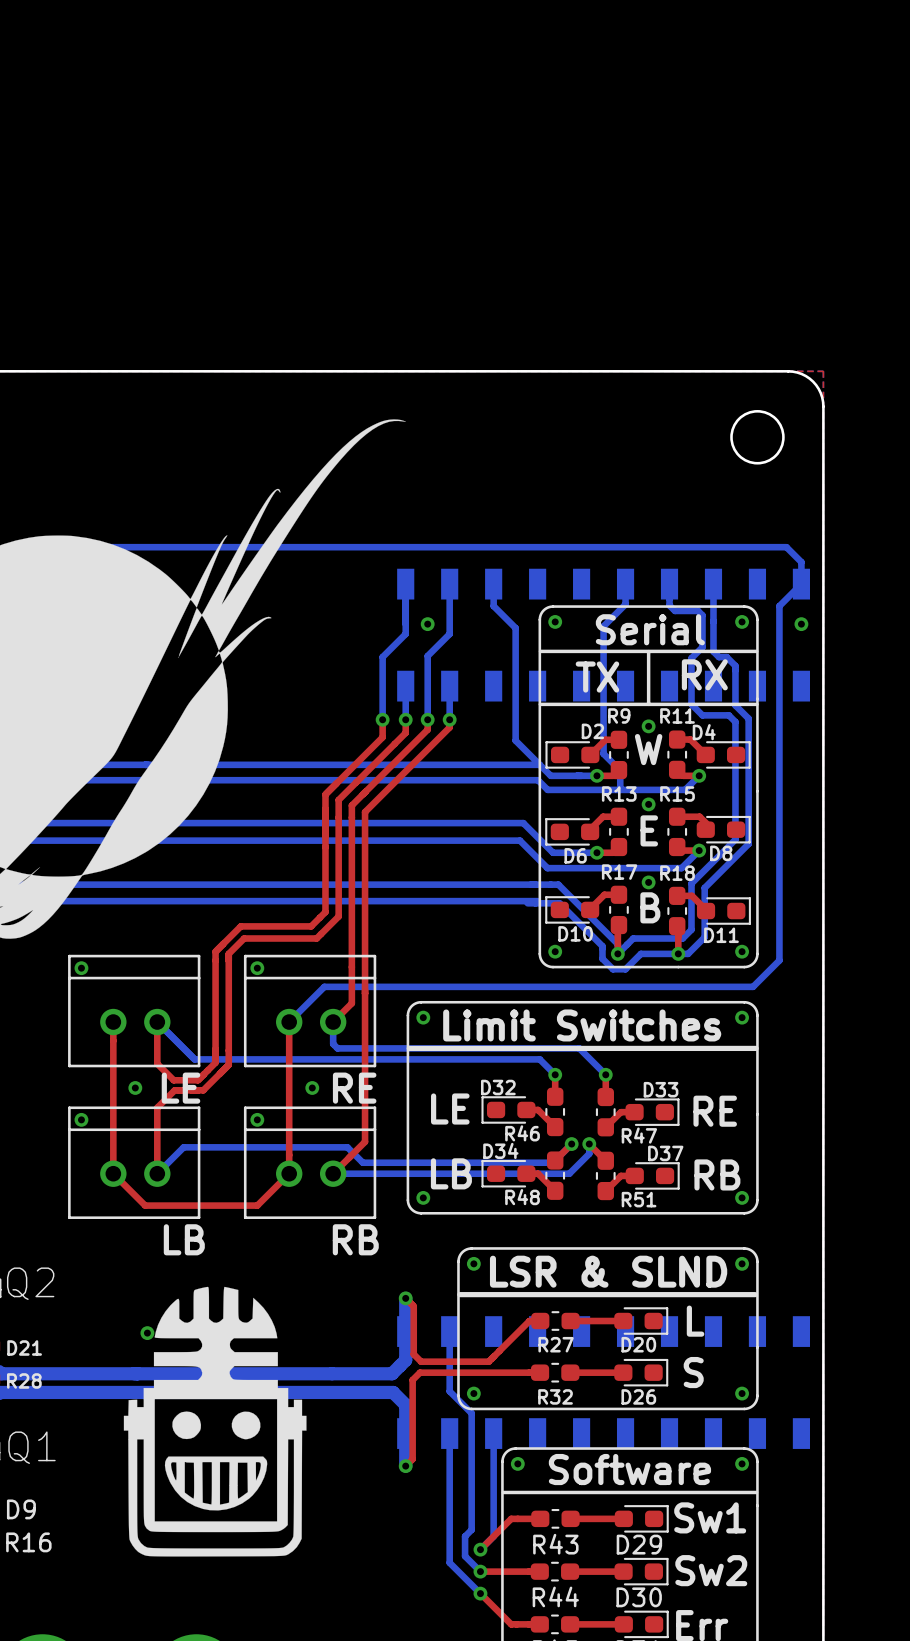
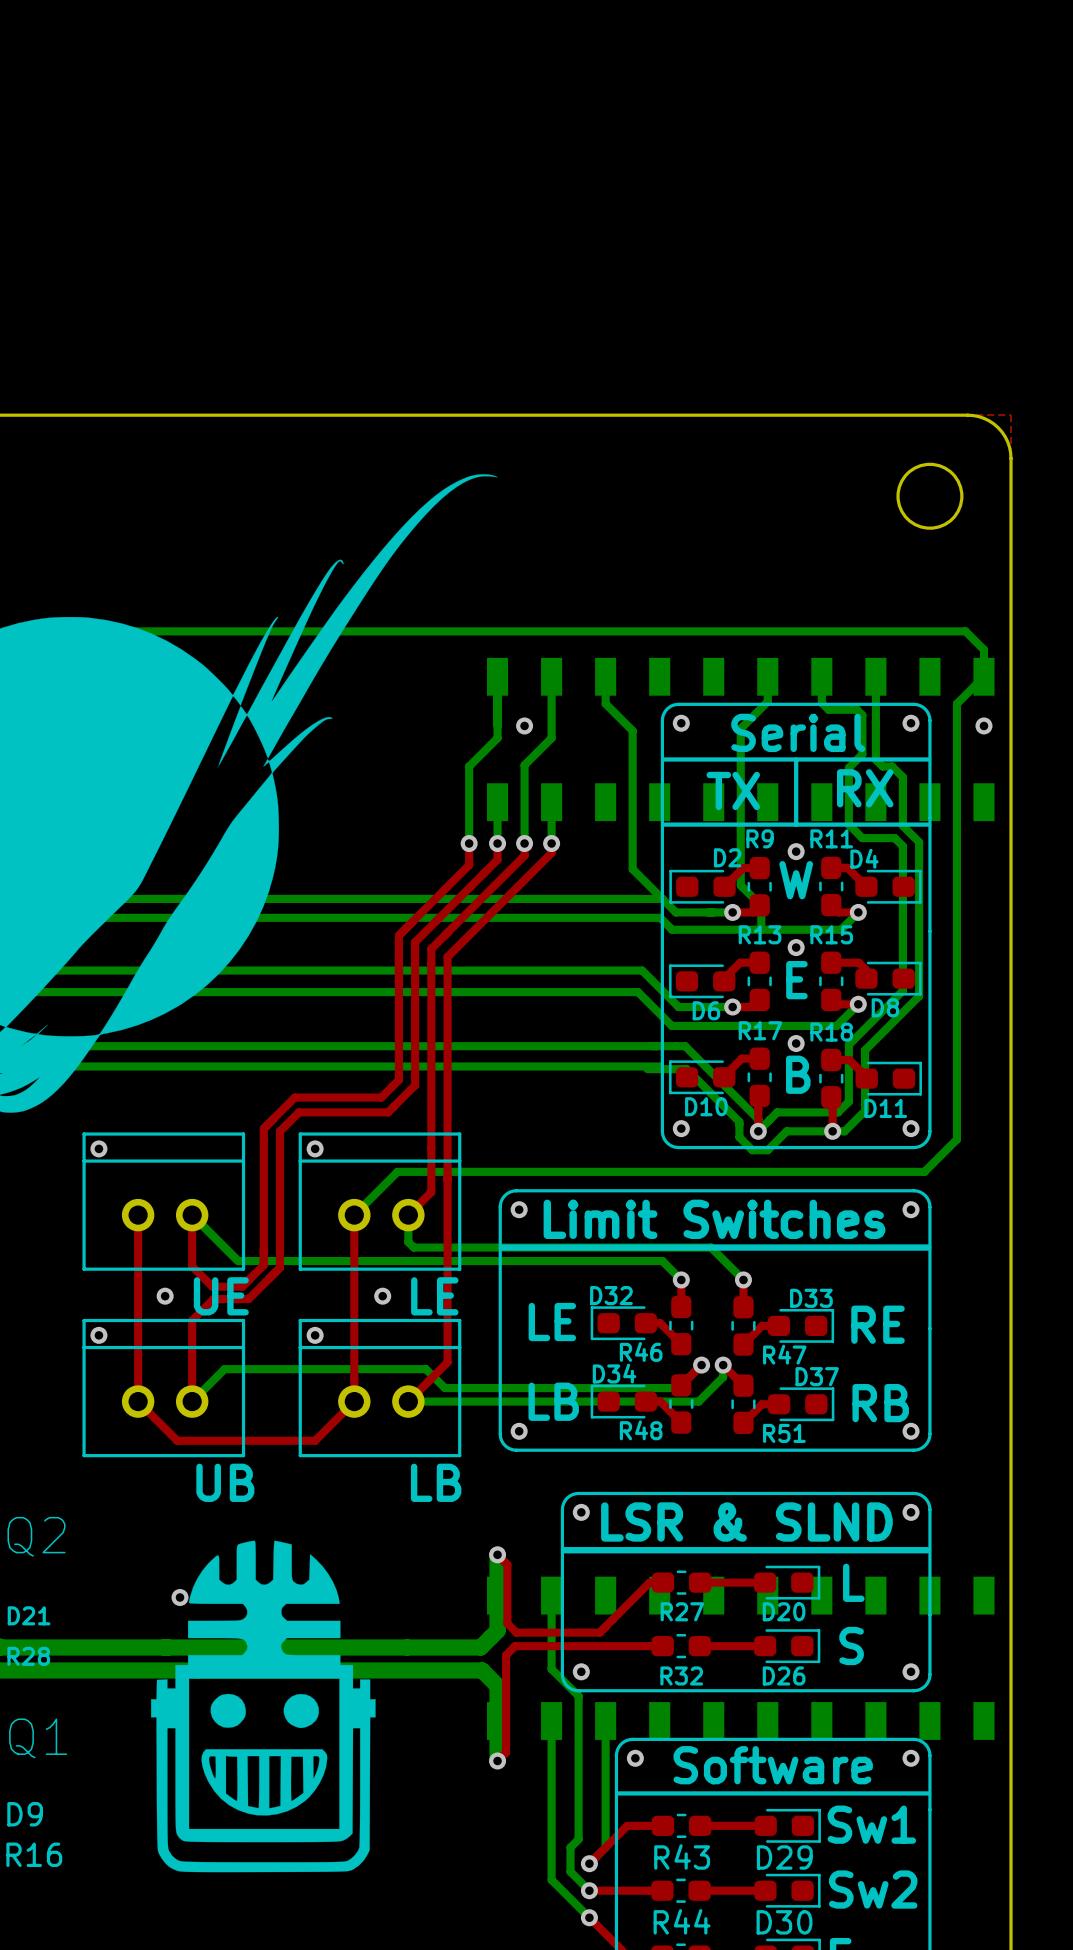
text: LE (181, 1088) -> UE (221, 1296)
text: RE (354, 1088) -> LE (434, 1296)
text: LB (184, 1239) -> UB (225, 1482)
text: RB (355, 1239) -> LB (436, 1482)

